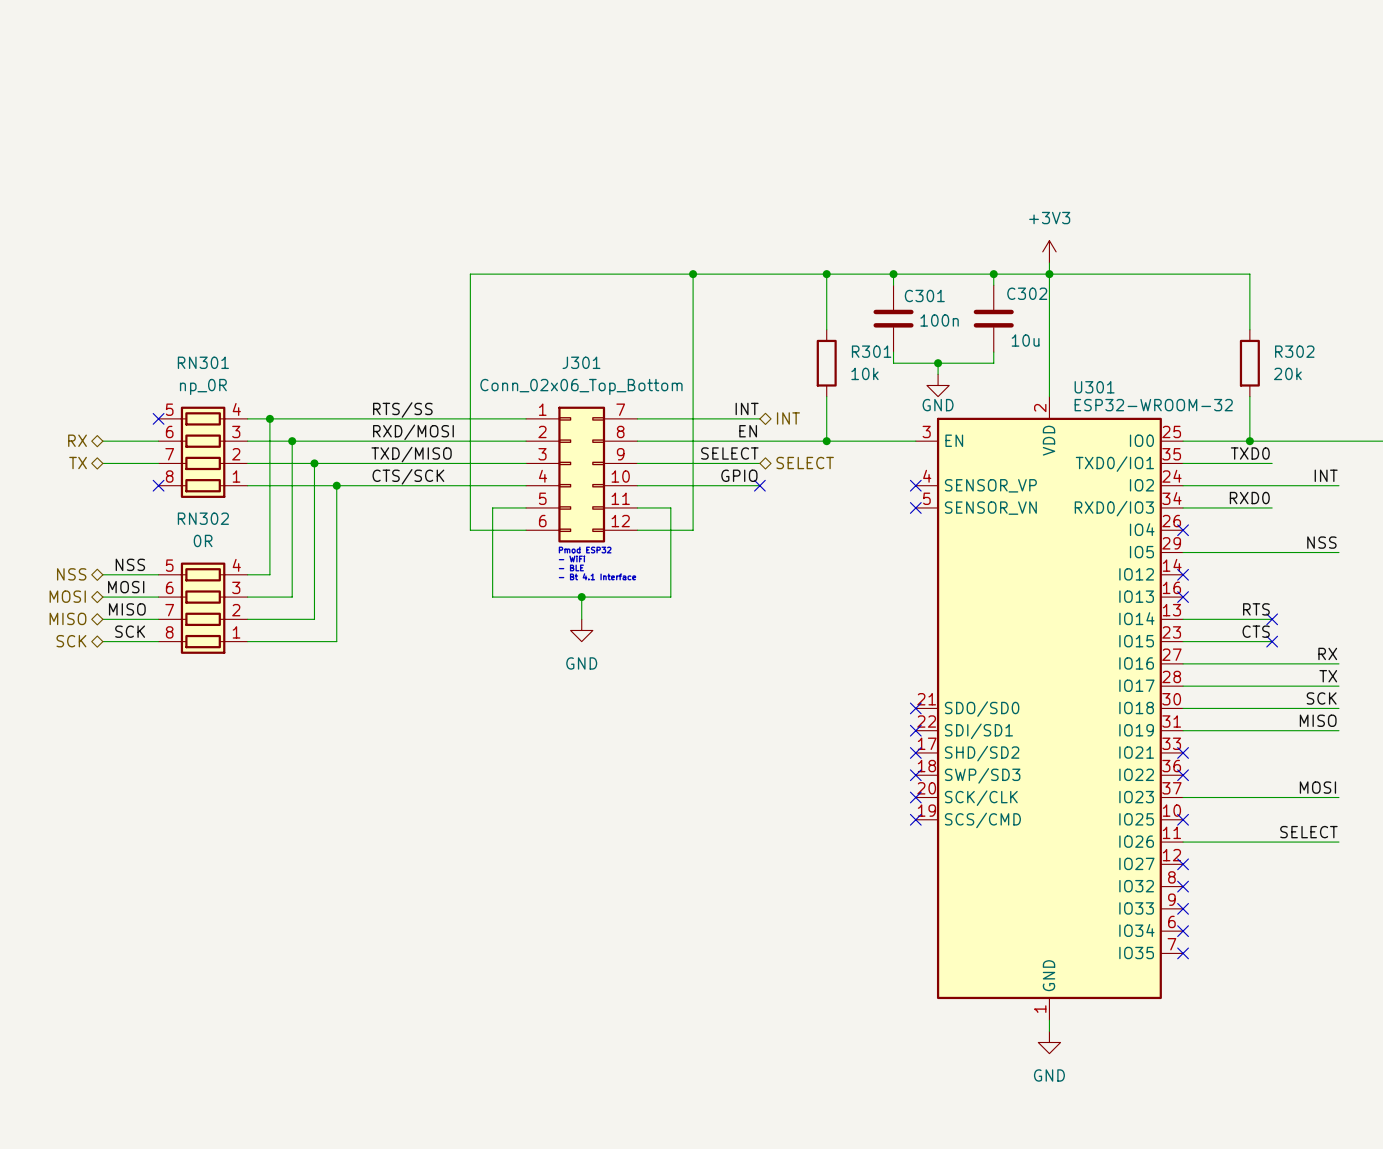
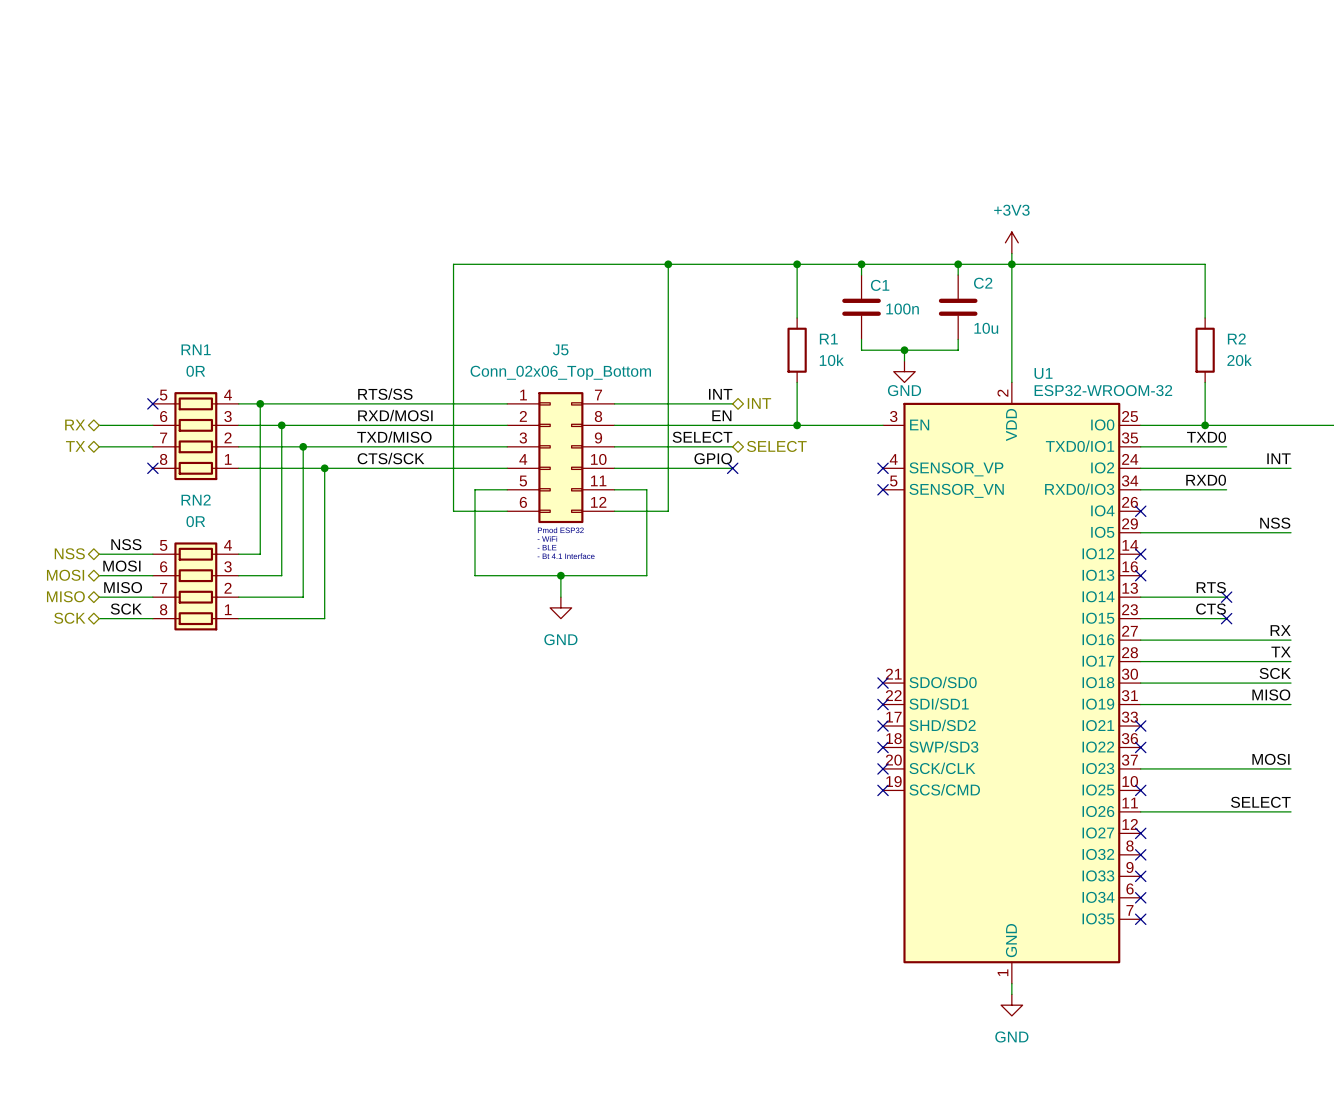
C302 name: C302 (1027, 293) -> C2 (983, 283)
C301 name: C301 (924, 295) -> C1 (880, 285)
R301 name: R301 (871, 351) -> R1 (828, 339)
R302 name: R302 (1294, 351) -> R2 (1236, 338)
RN301 name: RN301 (203, 362) -> RN1 (196, 349)
J301 name: J301 (581, 362) -> J5 (560, 349)
RN301 value: np_0R (203, 386) -> 0R (195, 371)
U301 name: U301 (1094, 387) -> U1 (1043, 373)
RN302 name: RN302 (203, 518) -> RN2 (196, 500)

